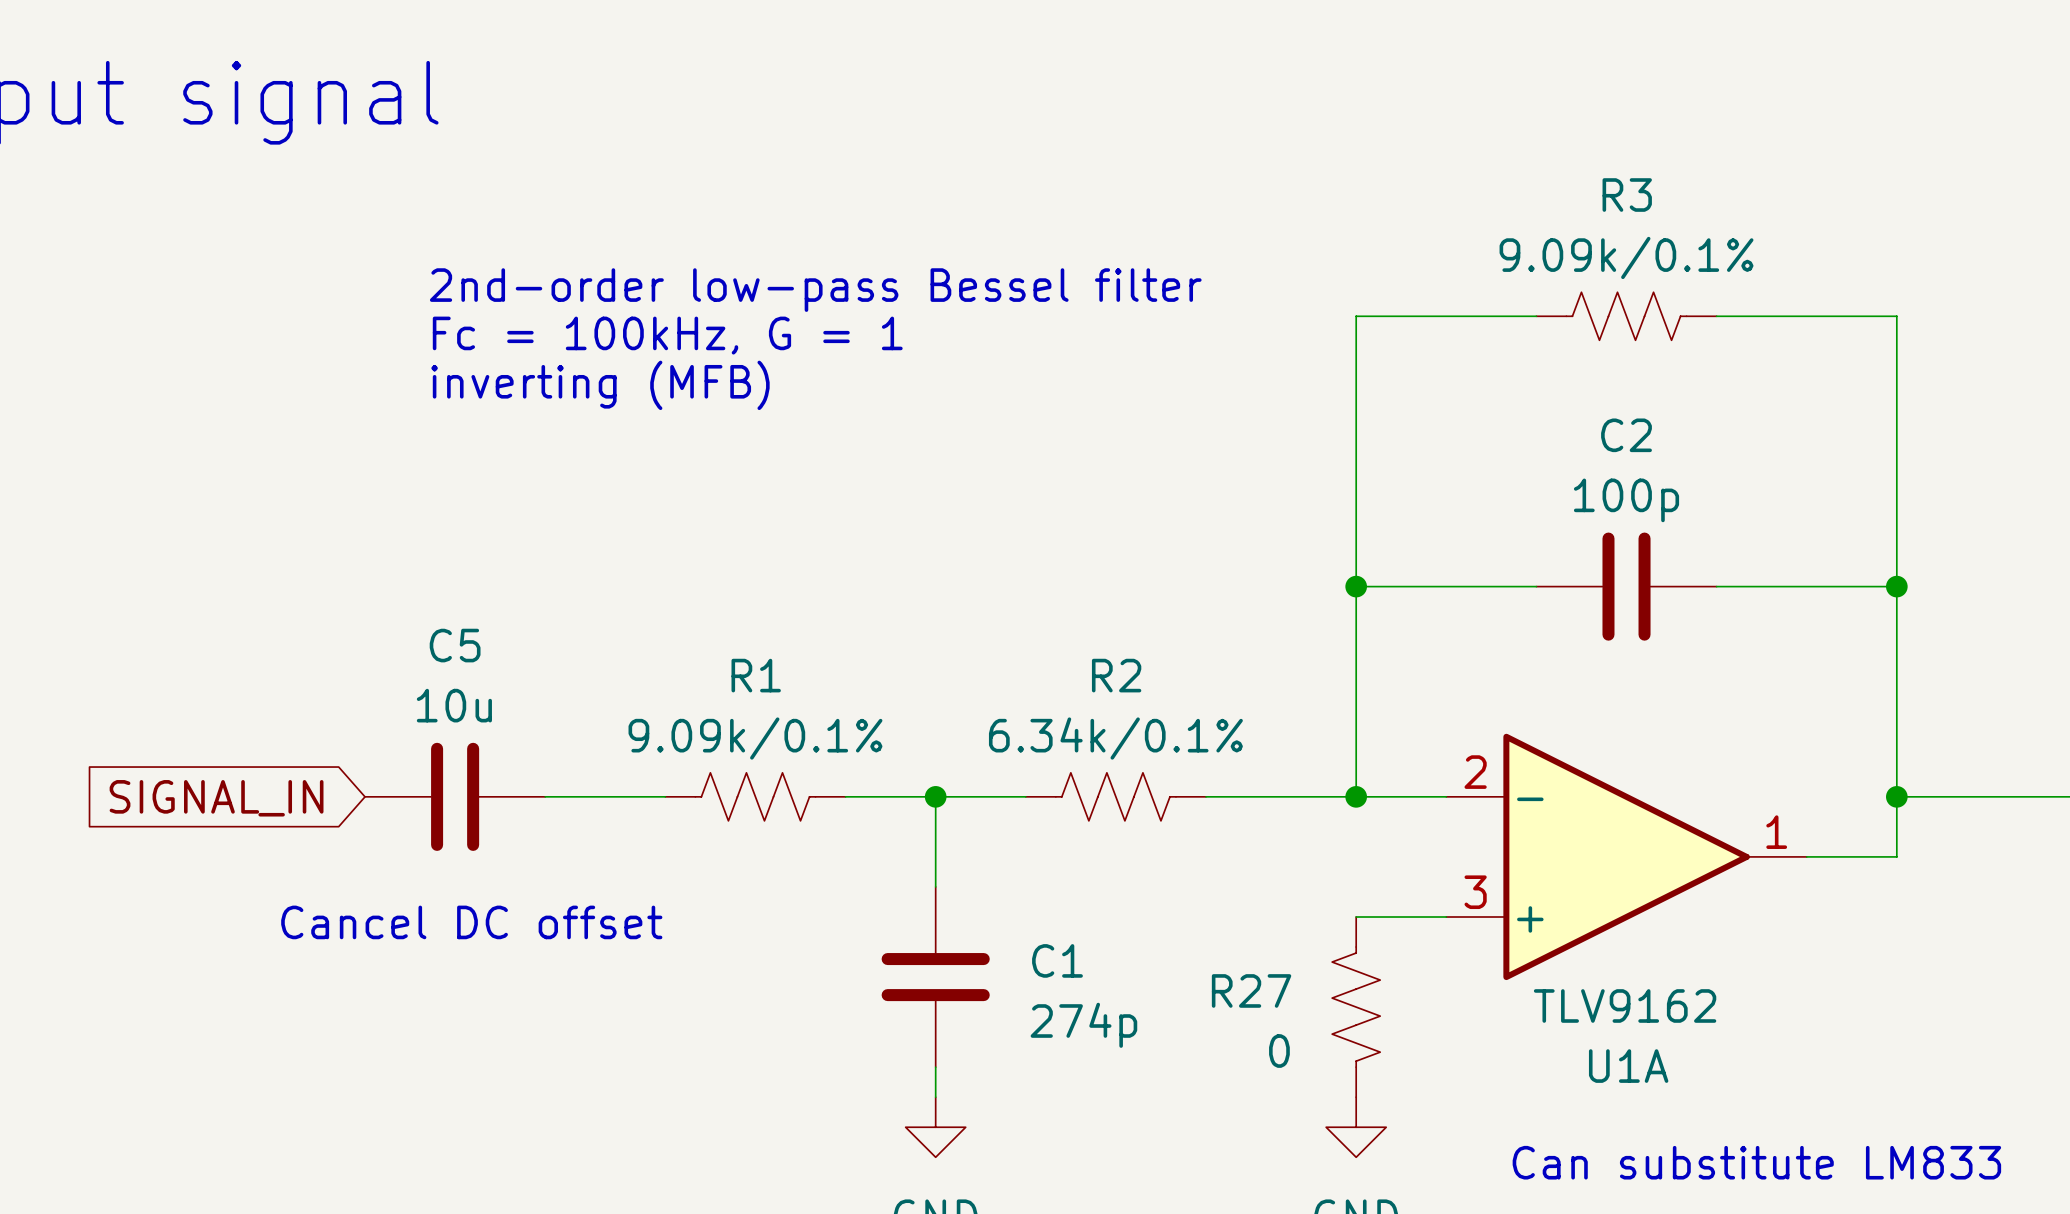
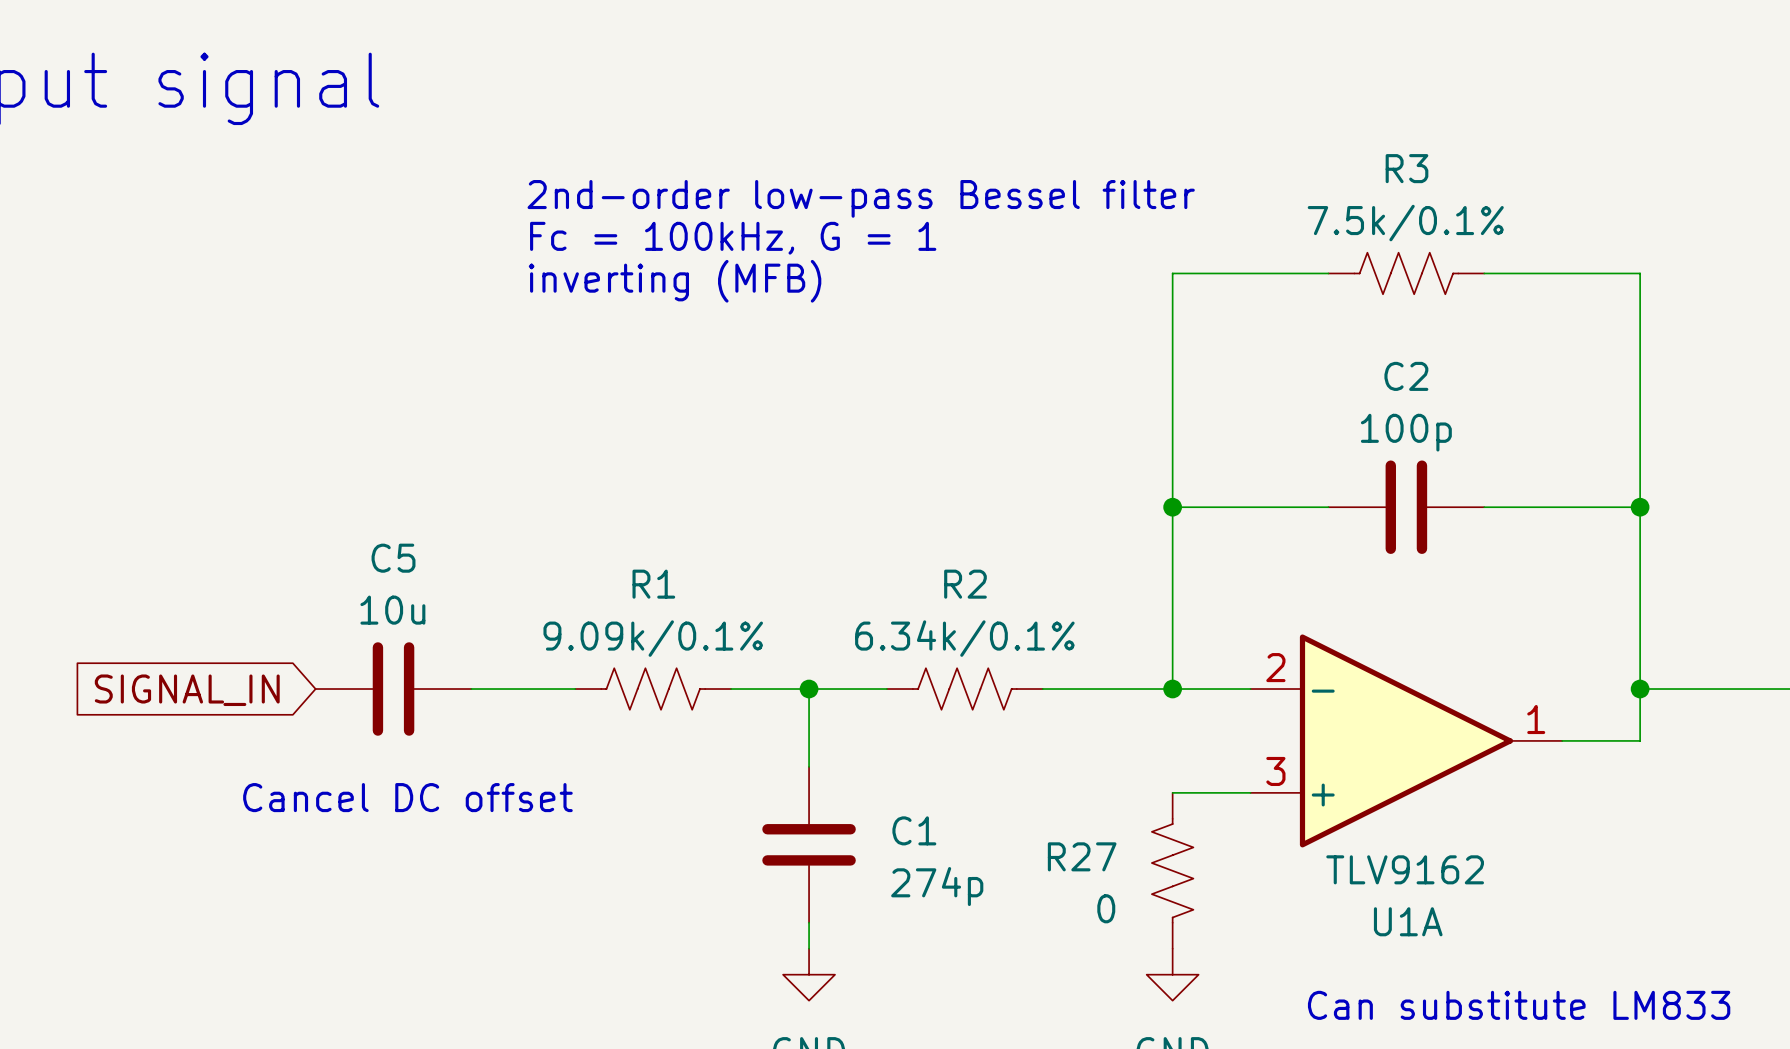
R3 value: 9.09k/0.1% (1626, 257) -> 7.5k/0.1% (1405, 223)
text position: 2nd-order low-pass Bessel filter (815, 290) -> 2nd-order low-pass Bessel filter (861, 198)
text position: Fc = 100kHz, G = 1 (667, 335) -> Fc = 100kHz, G = 1 (733, 238)
text position: inverting (MFB) (600, 385) -> inverting (MFB) (675, 281)

